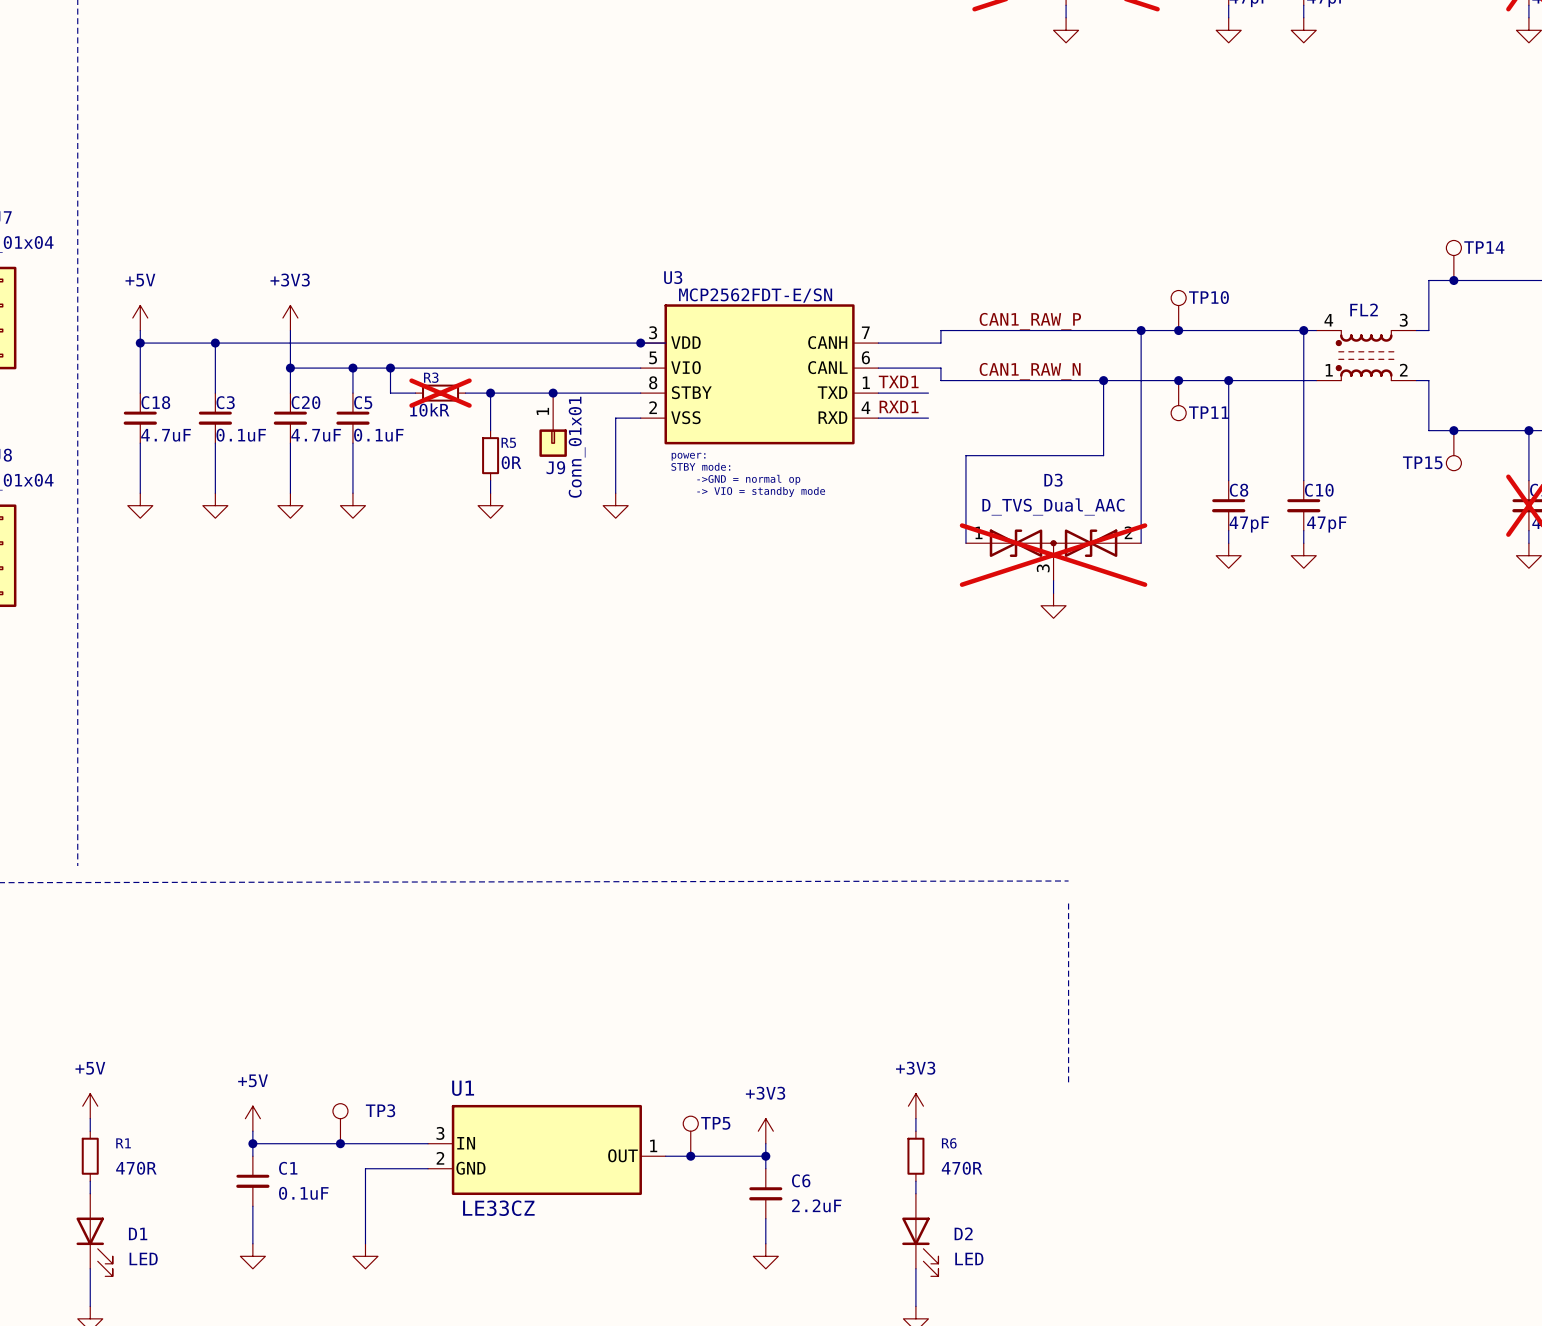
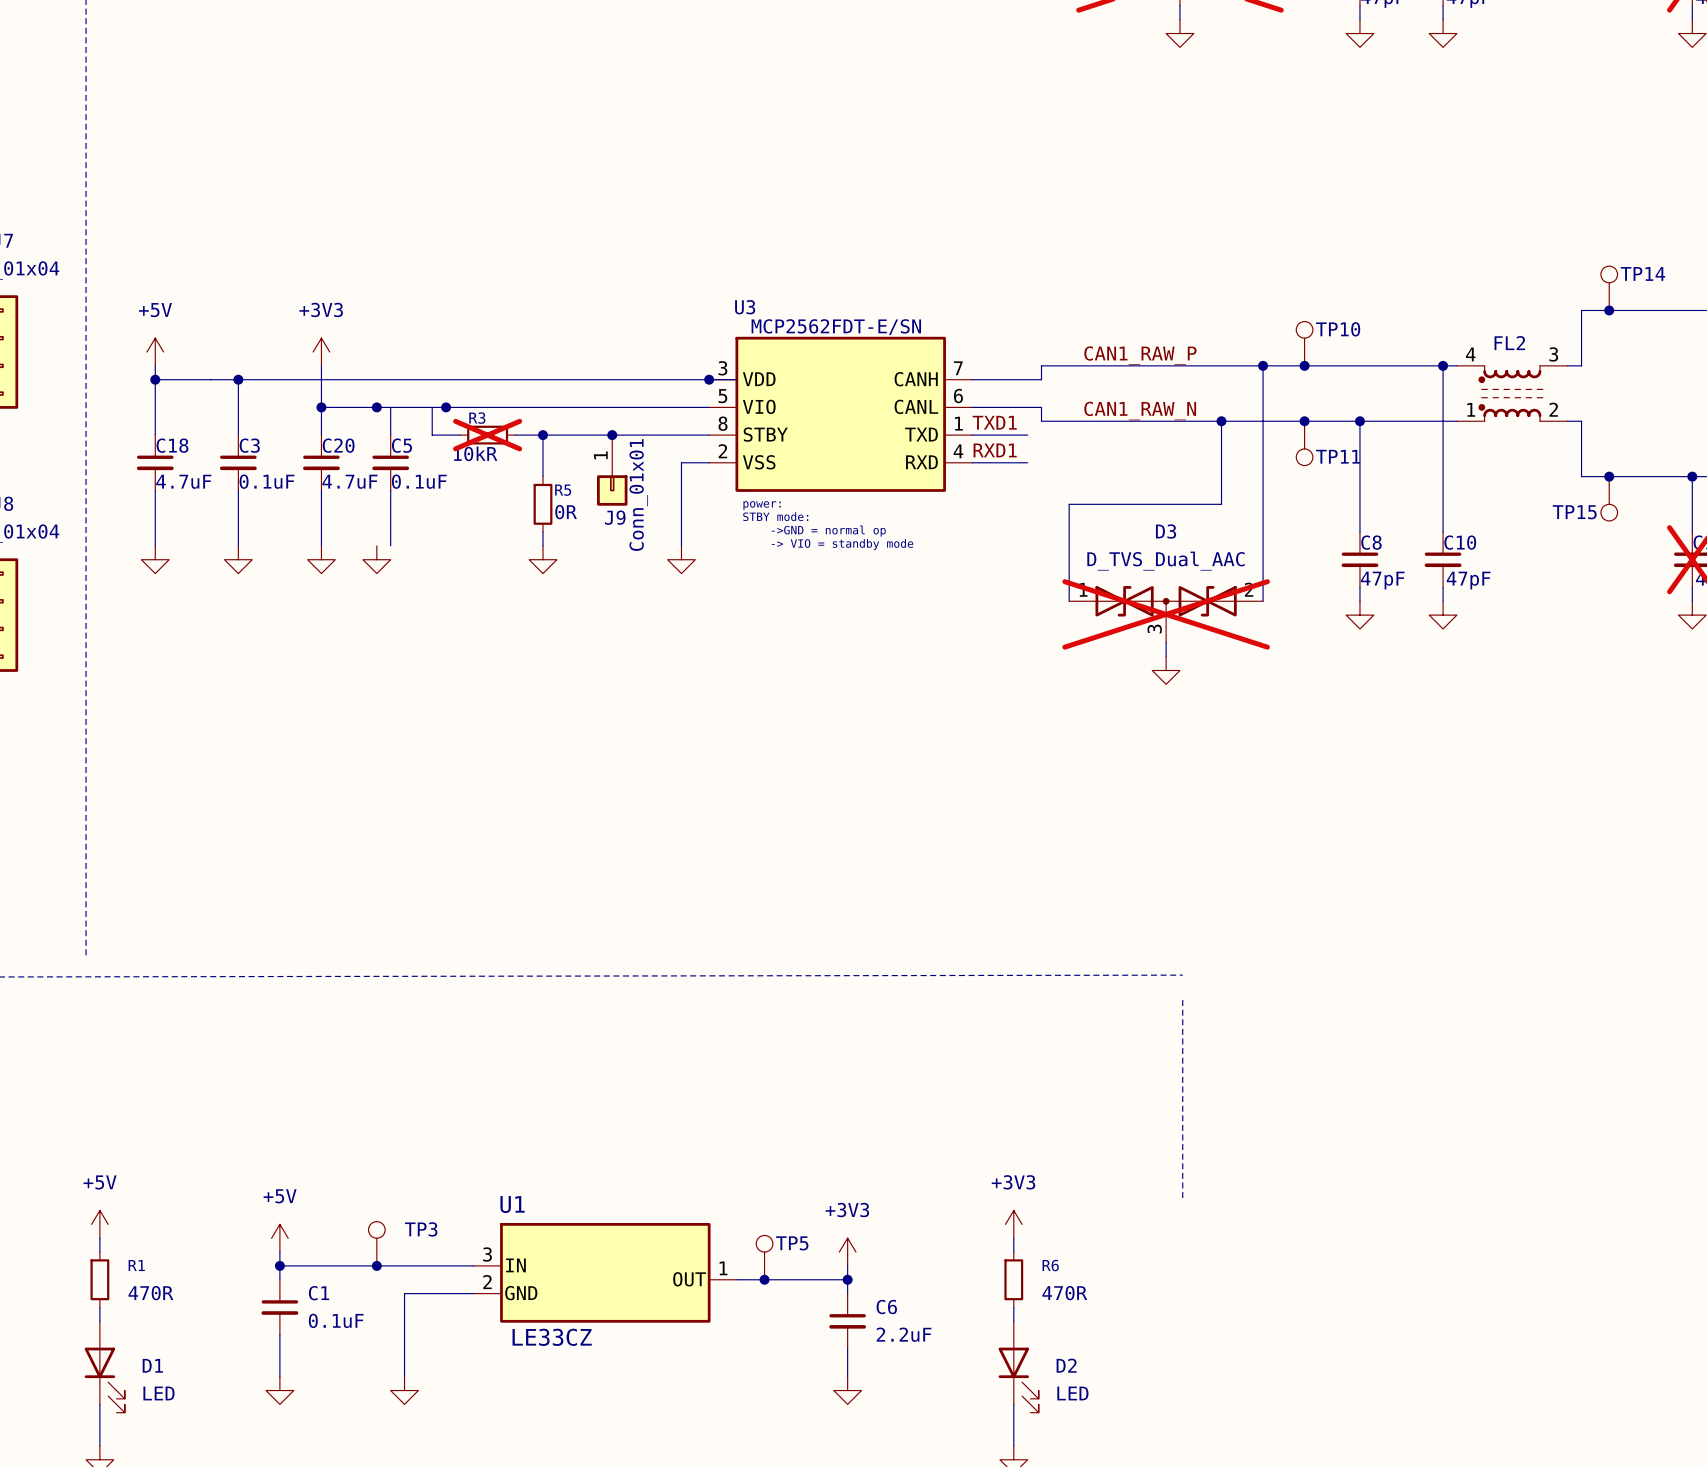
junction position: (352, 368) -> (376, 407)
junction position: (390, 368) -> (446, 407)
power symbol position: (352, 505) -> (376, 559)

